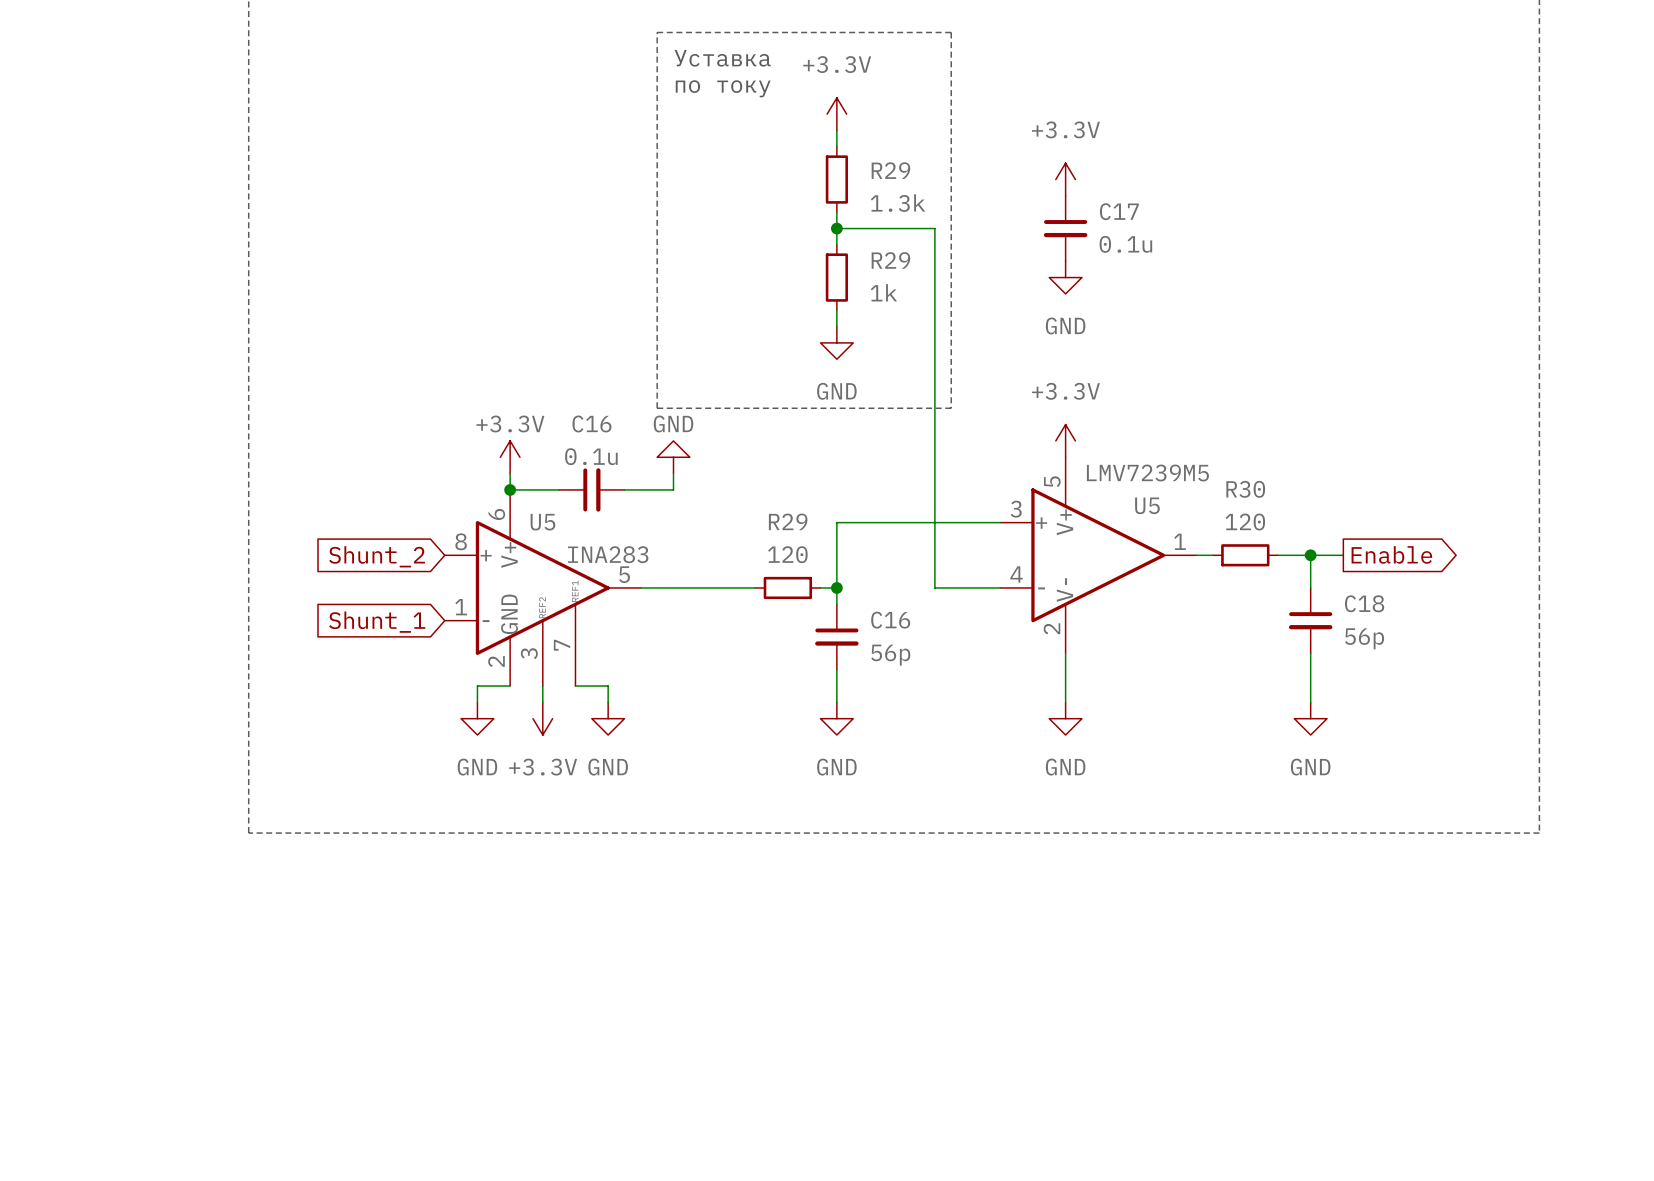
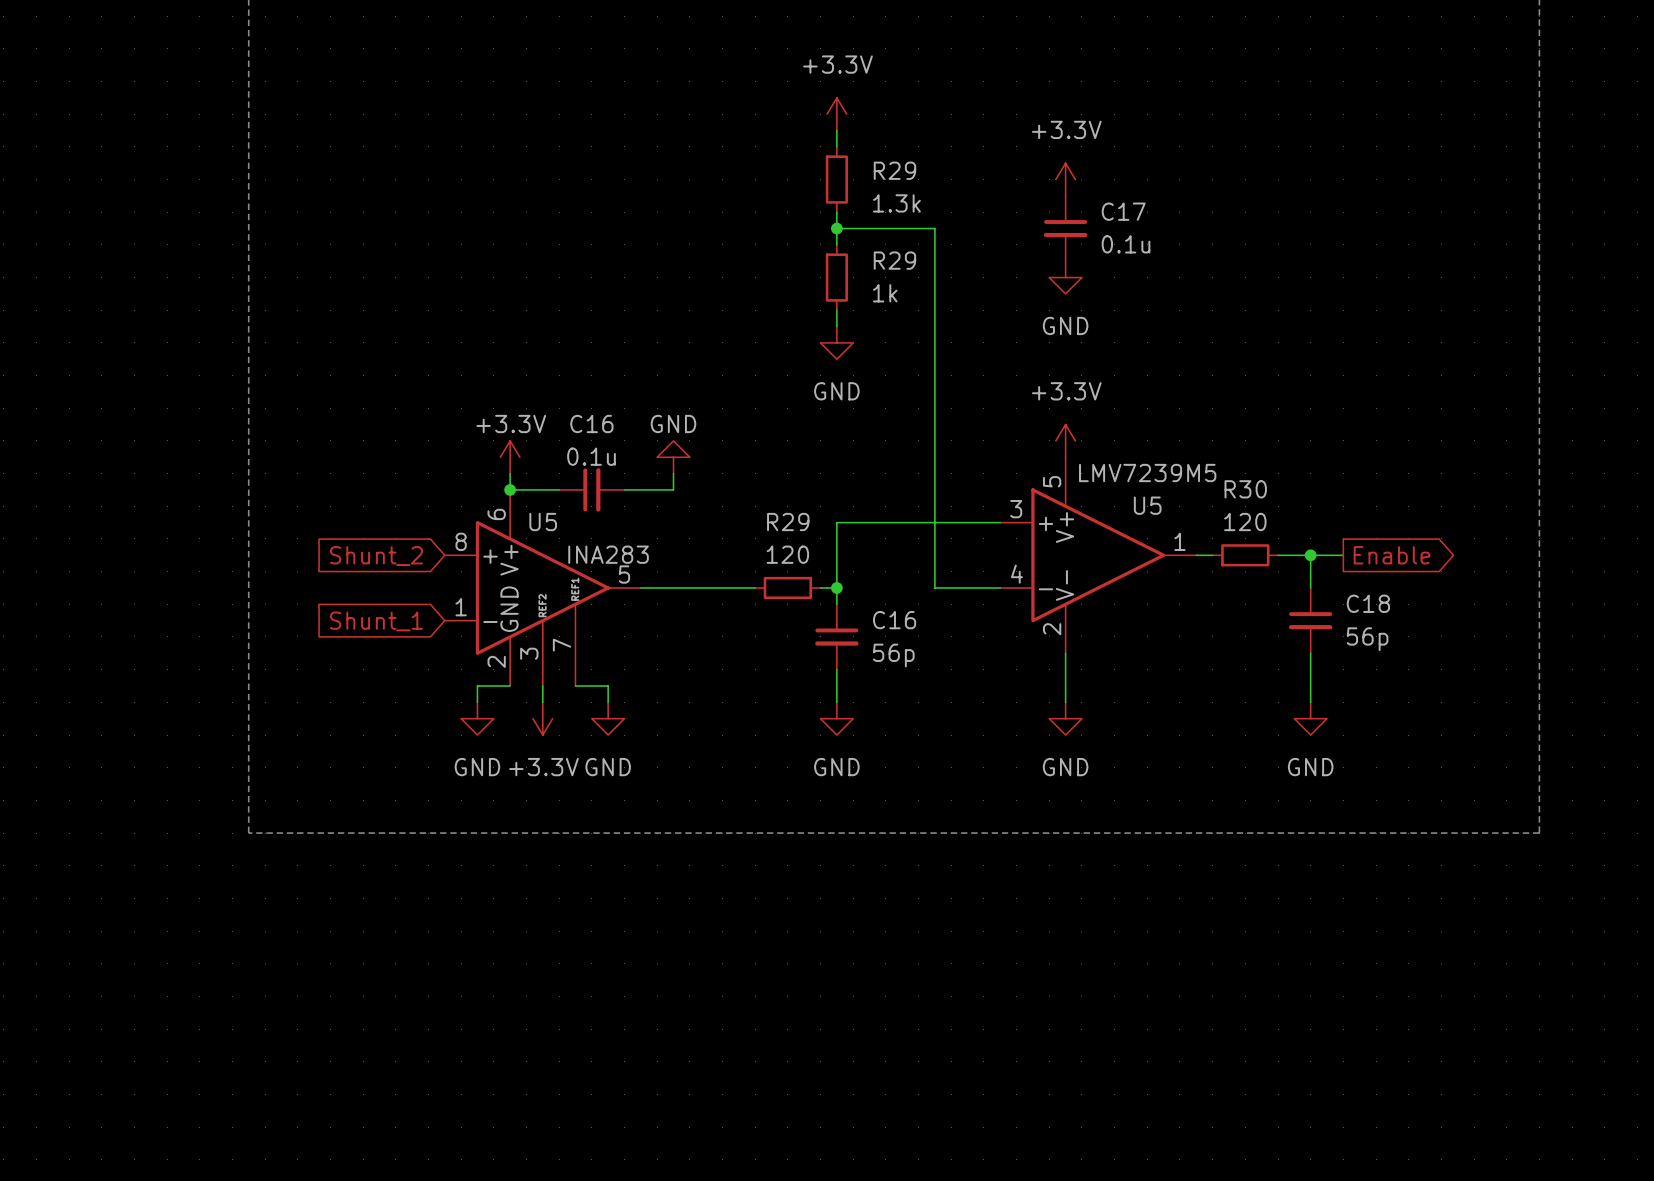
line: (657, 32) (951, 32) (951, 408) (657, 408) (657, 32) -> none
text: Уставка (722, 58) -> none
text: по току (723, 88) -> none

